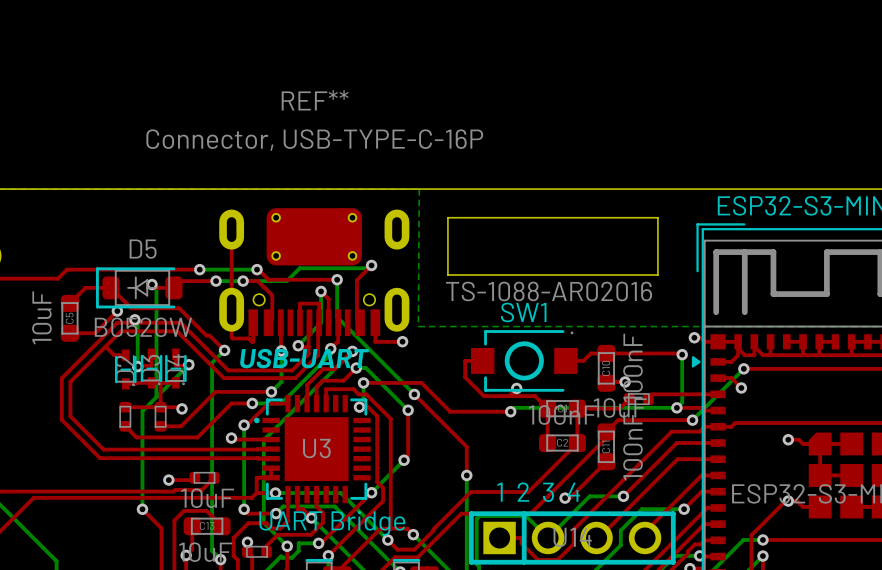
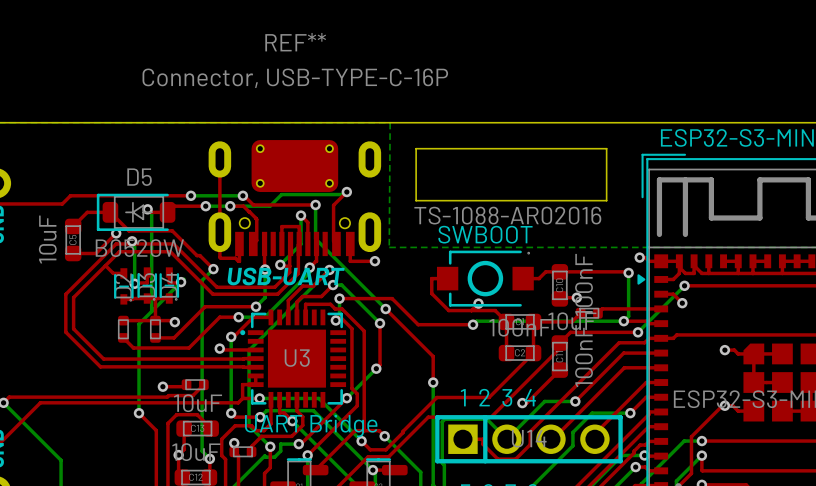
SW1 name: SW1 (523, 312) -> SWBOOT (485, 234)

